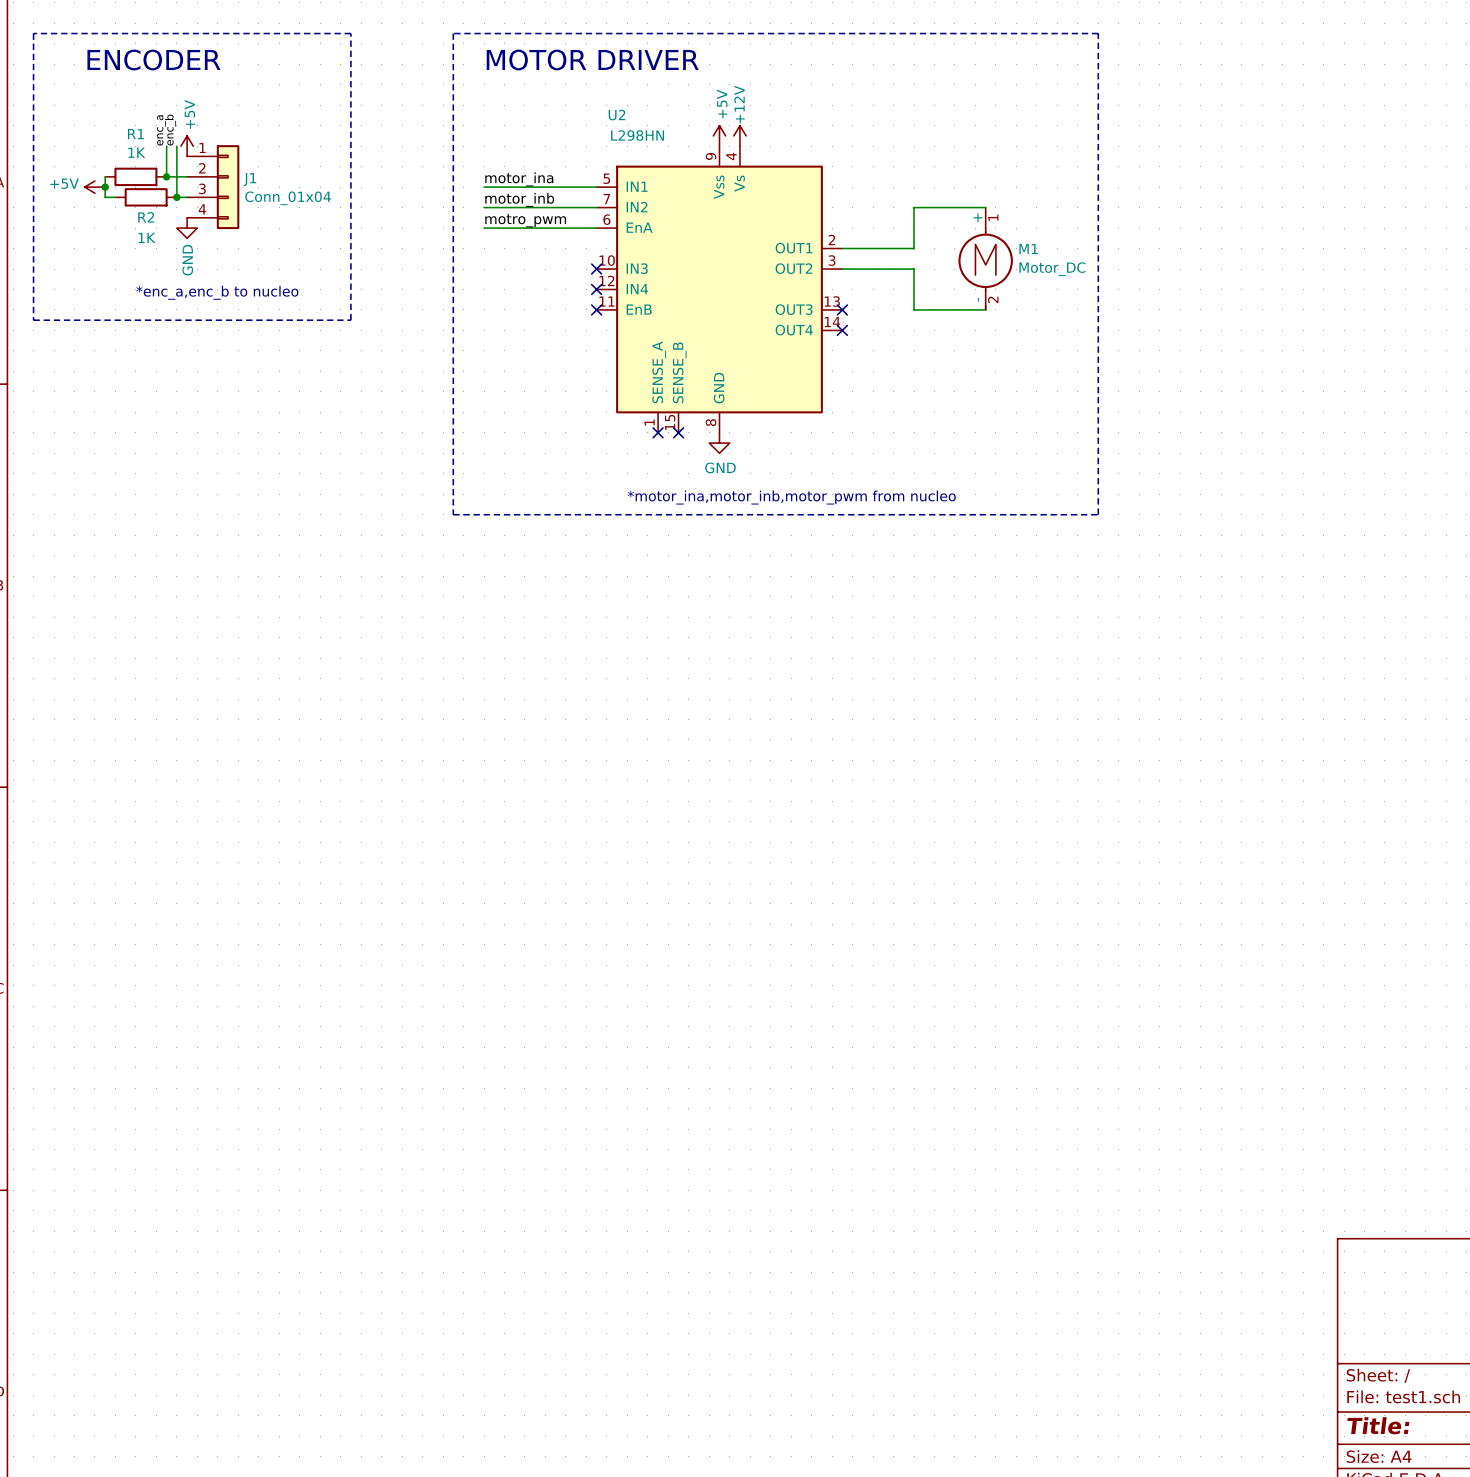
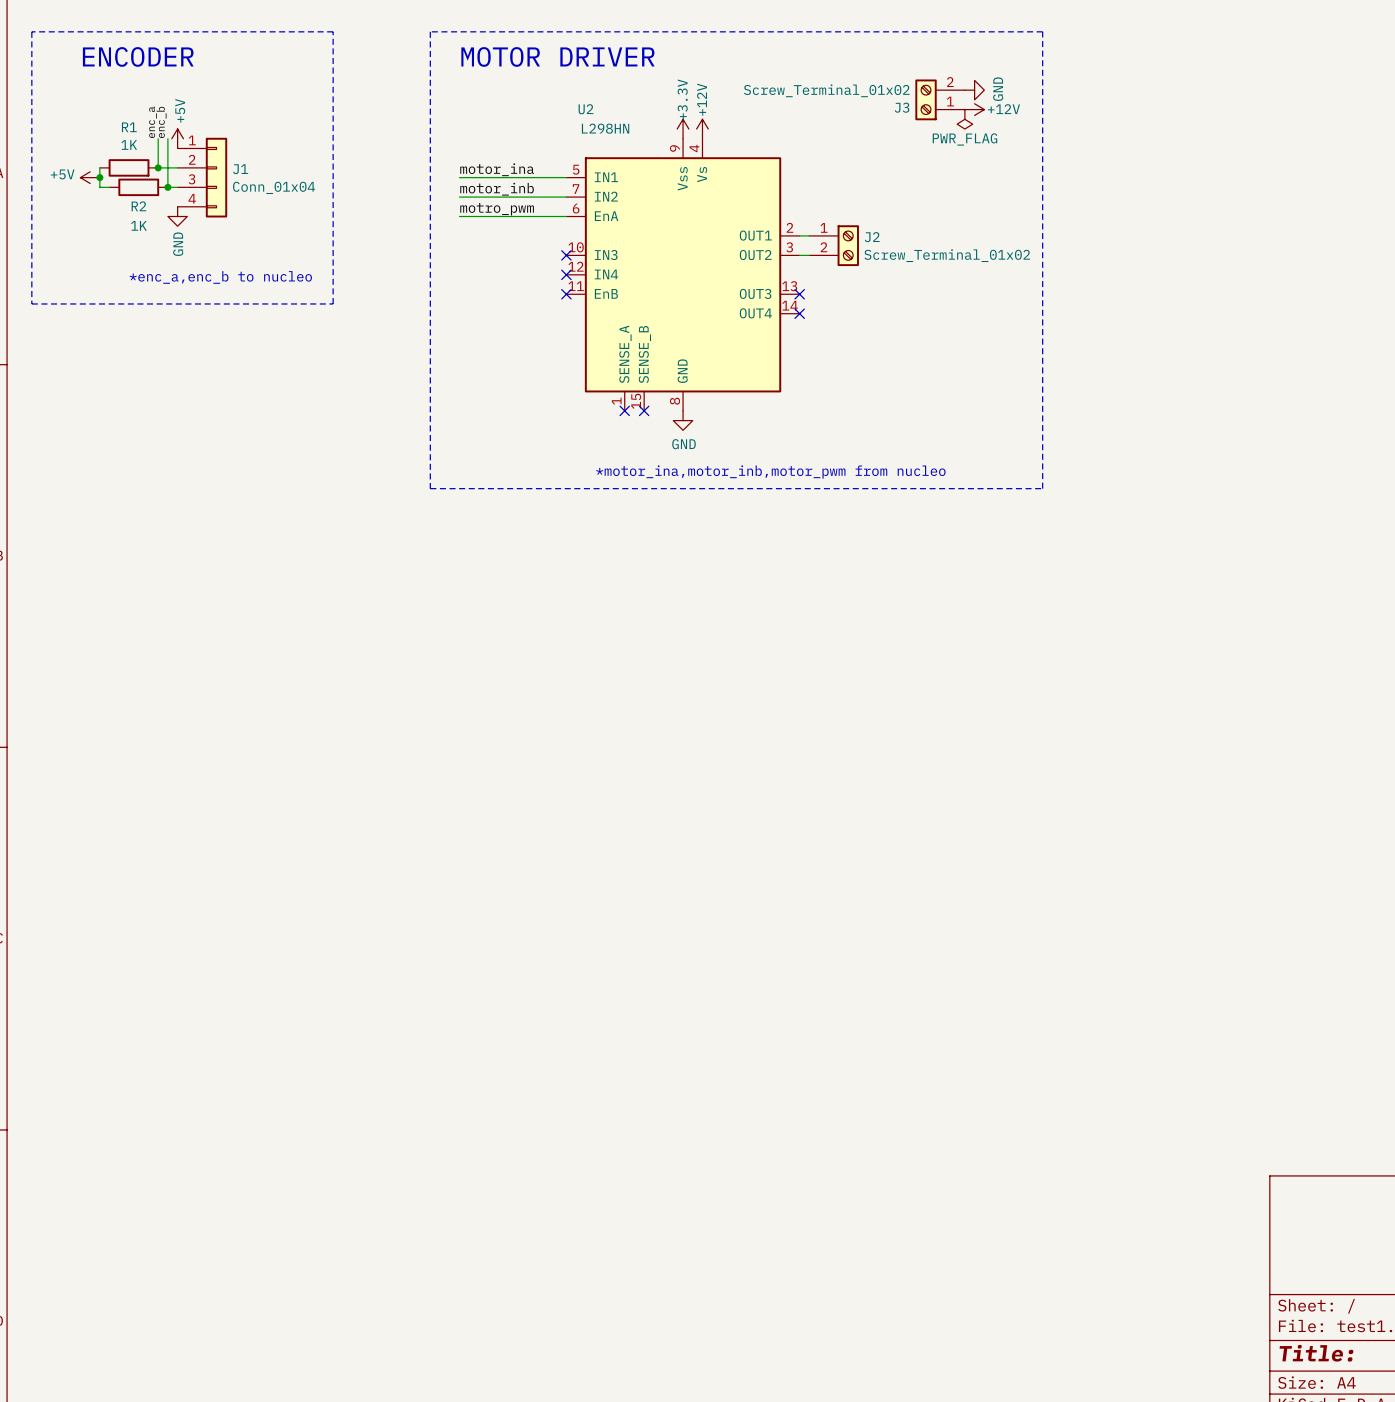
power symbol: none -> GND (974, 90)
J3: none -> Screw_Terminal_01x02 (940, 99)
power symbol: none -> +12V (974, 109)
power symbol: none -> PWR_FLAG (964, 119)
power symbol: +5V (719, 135) -> +3.3V (683, 129)
wire: (985, 207) (914, 207) (914, 248) (852, 248) -> none
J2: none -> Screw_Terminal_01x02 (834, 245)
M1: Motor_DC (985, 258) -> none
wire: (852, 269) (914, 269) (914, 309) (985, 309) -> none

